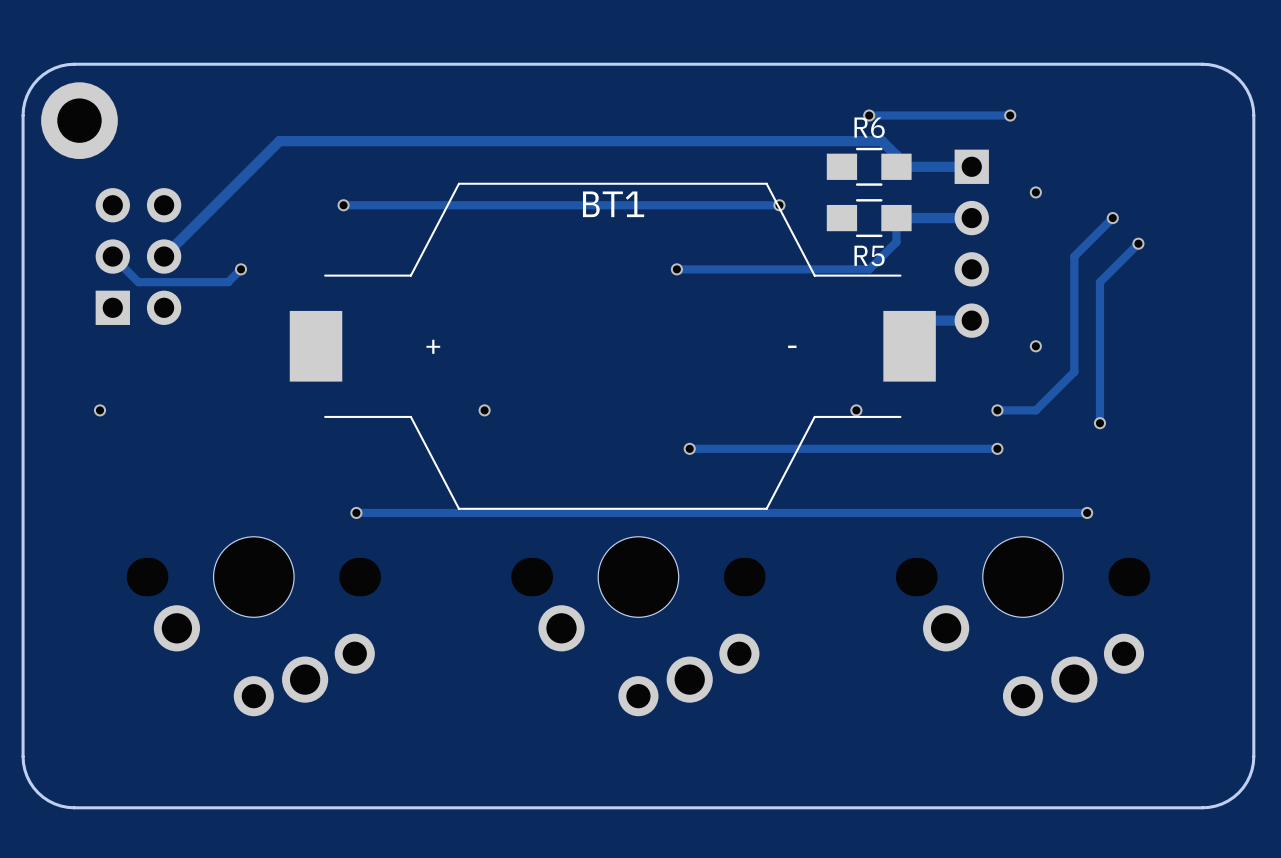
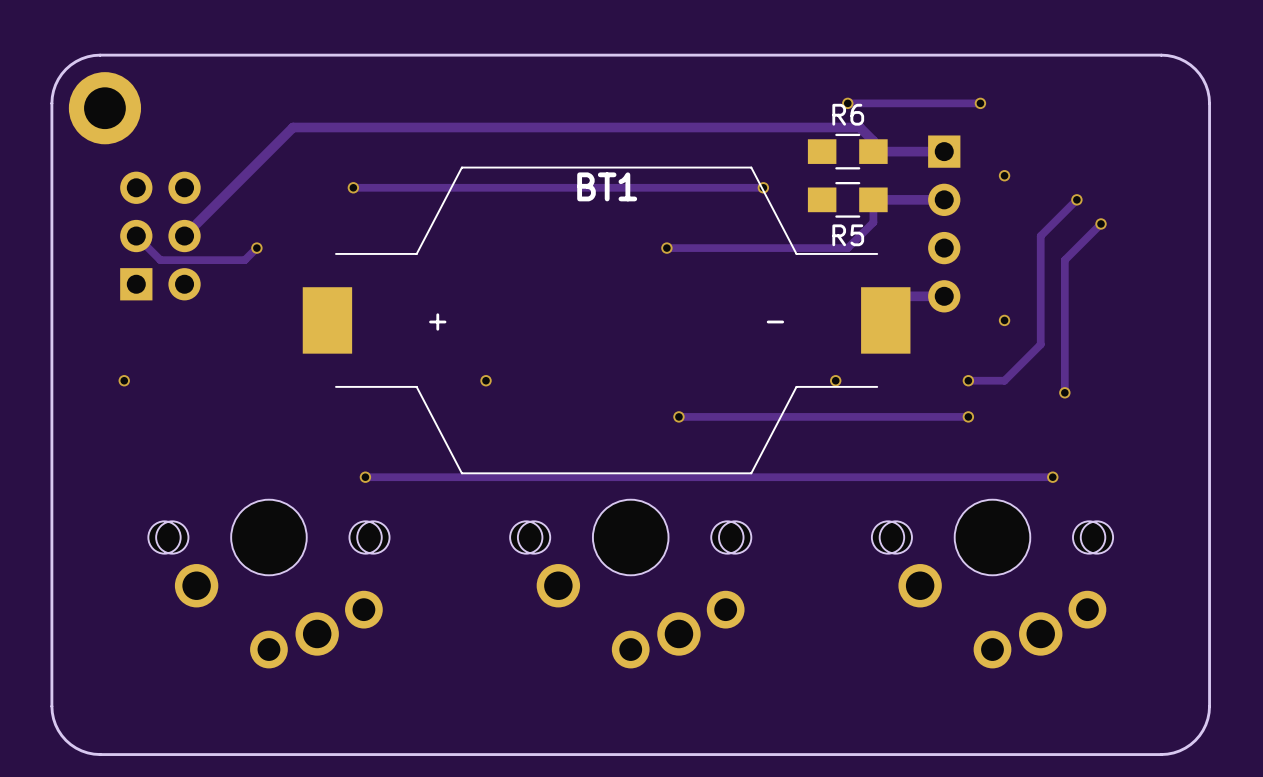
part footprint: [126, 536, 382, 717] -> [148, 499, 390, 669]
part footprint: [511, 536, 766, 717] -> [510, 499, 752, 669]
part footprint: [895, 536, 1151, 717] -> [871, 499, 1114, 669]

